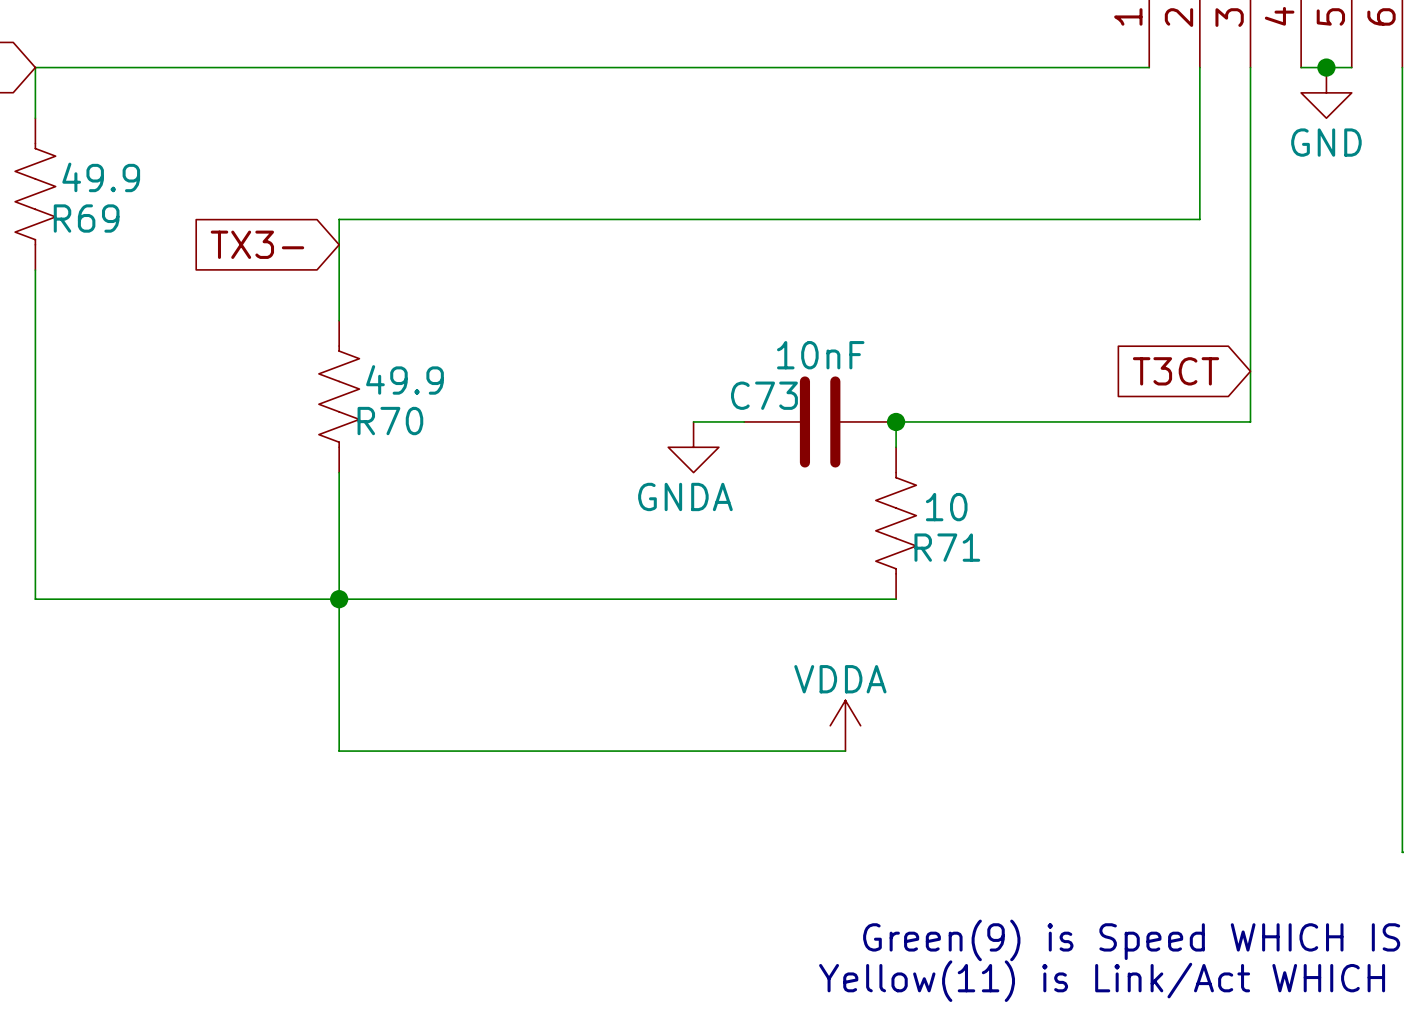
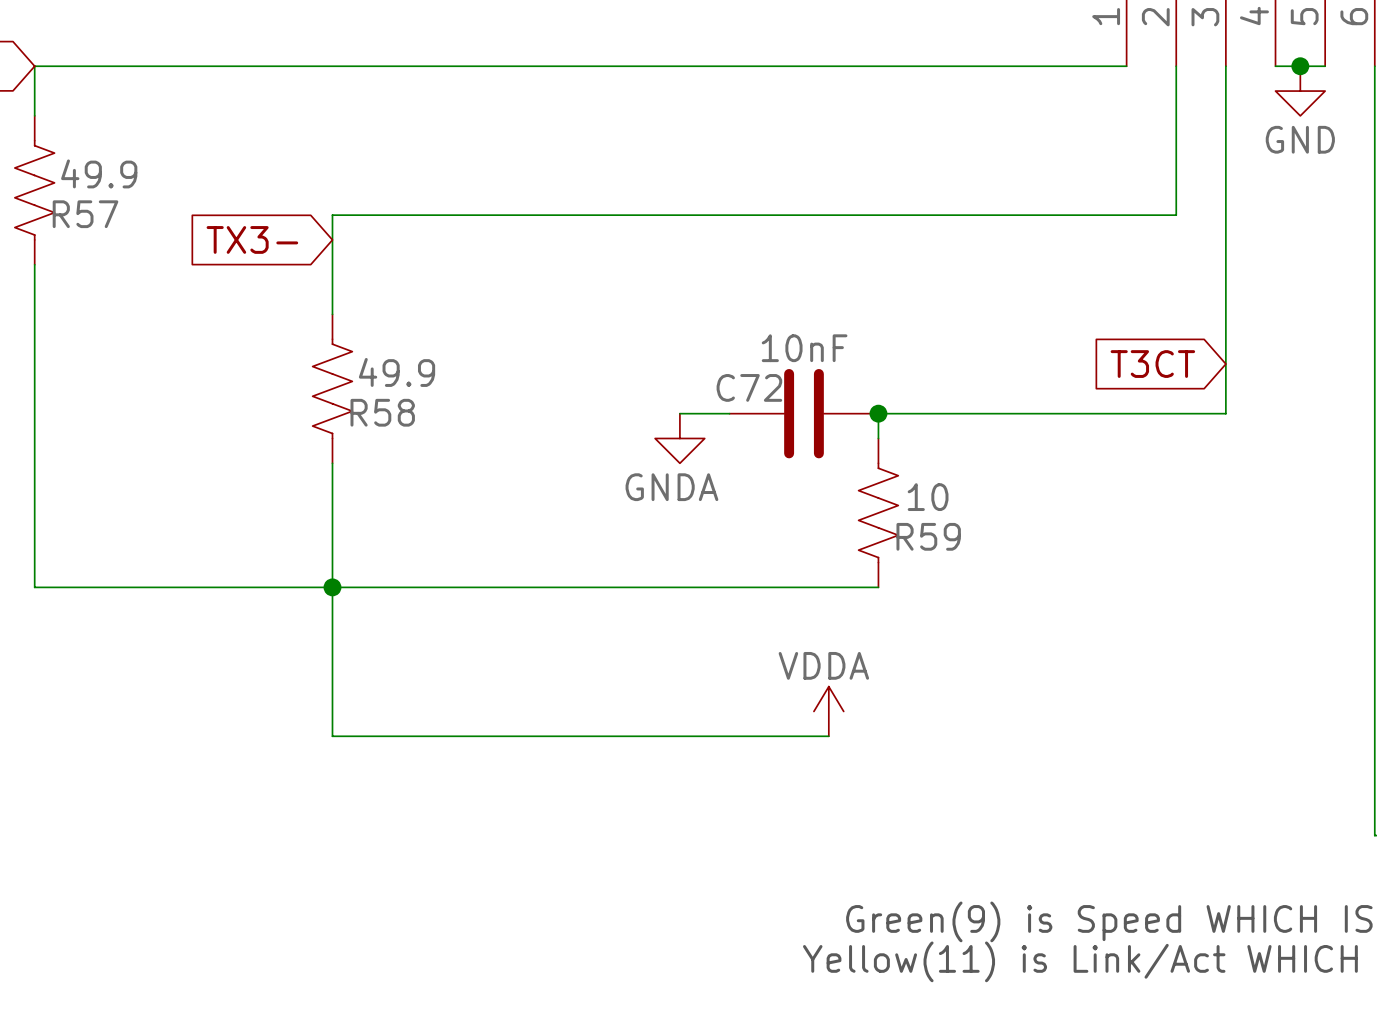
R69 name: R69 (86, 218) -> R57 (85, 214)
C73 name: C73 (764, 395) -> C72 (749, 387)
R70 name: R70 (390, 421) -> R58 (382, 412)
R71 name: R71 (947, 547) -> R59 (928, 536)

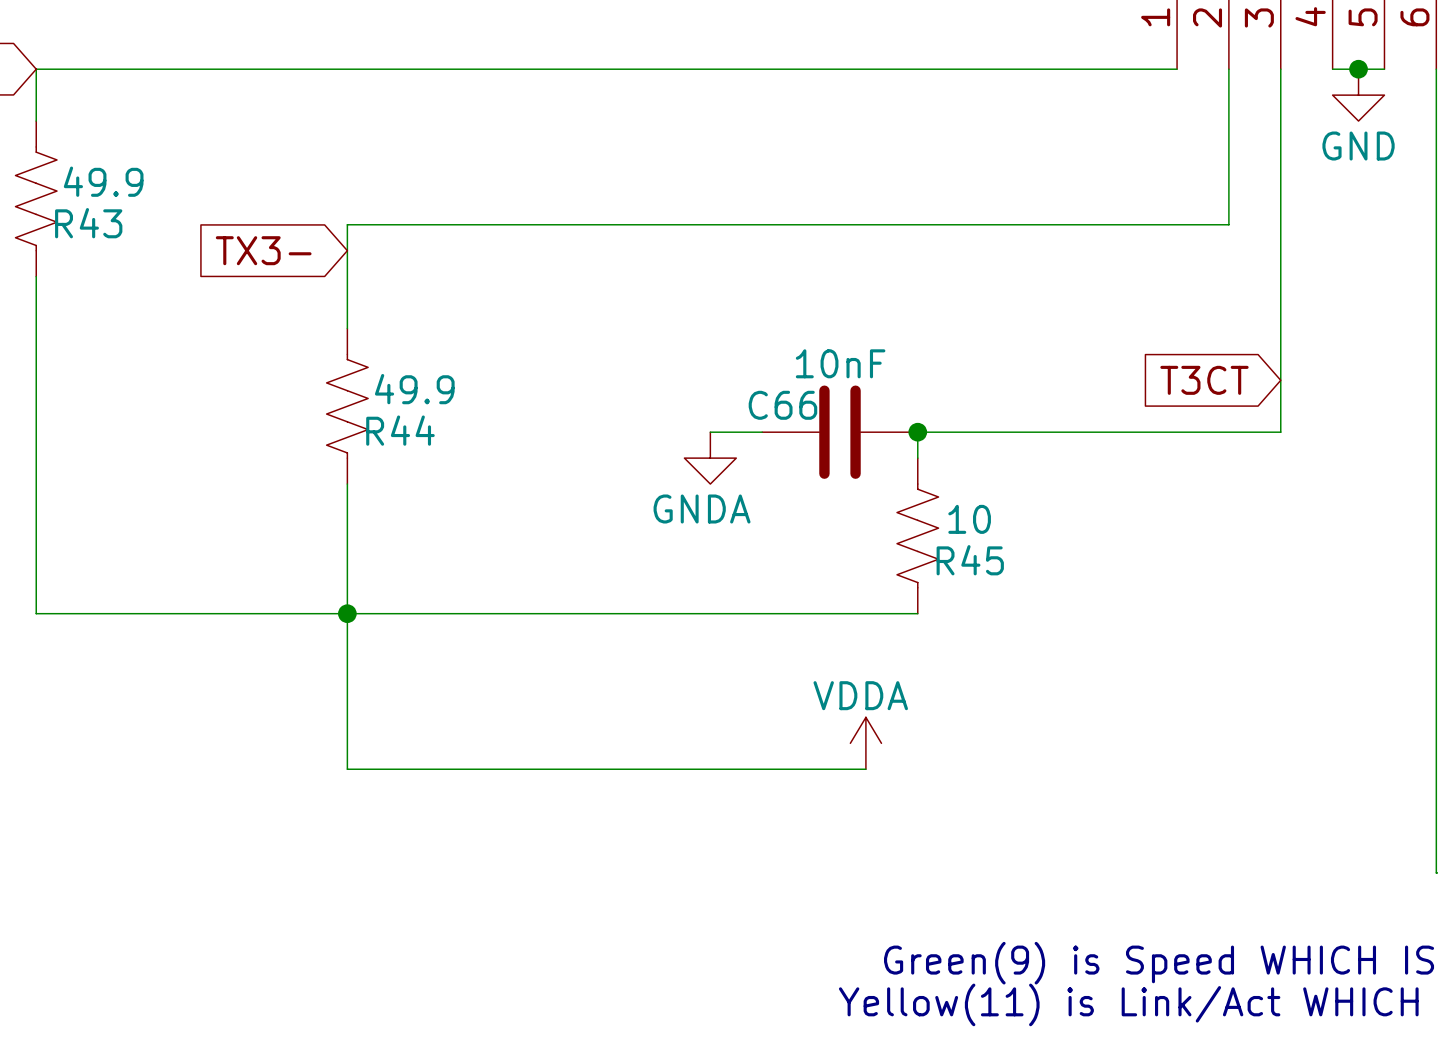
R57 name: R57 (85, 214) -> R43 (88, 223)
C72 name: C72 (749, 387) -> C66 (782, 405)
R58 name: R58 (382, 412) -> R44 (400, 430)
R59 name: R59 (928, 536) -> R45 (970, 560)

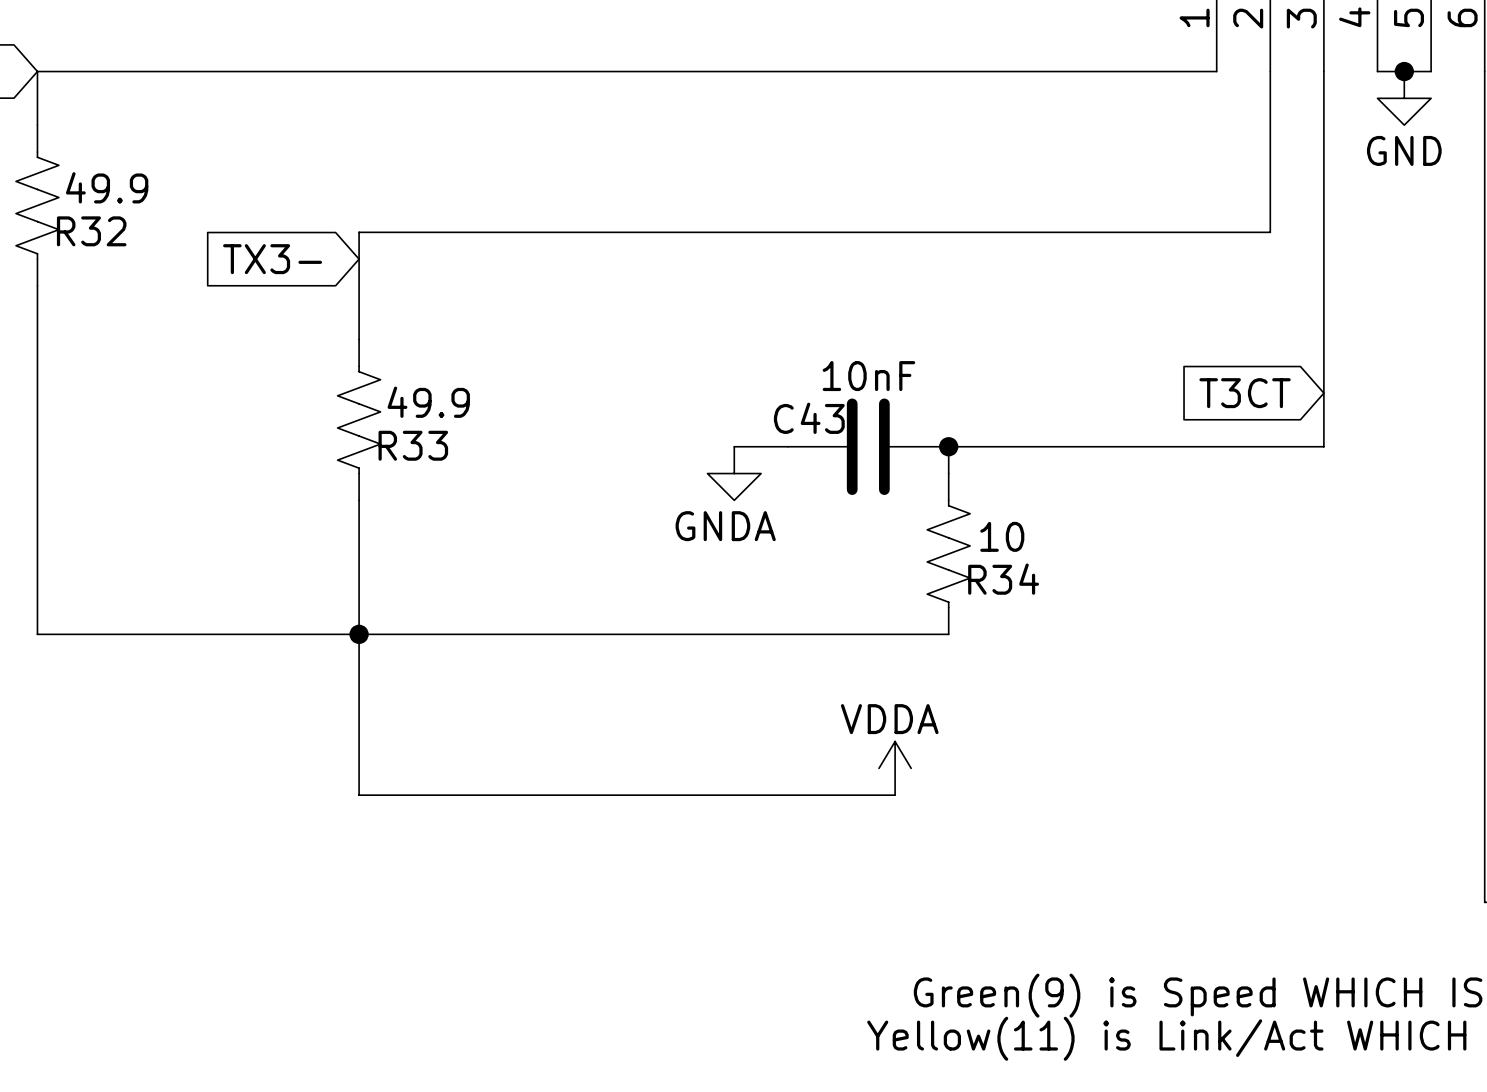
R43 name: R43 (88, 223) -> R32 (91, 231)
C66 name: C66 (782, 405) -> C43 (809, 418)
R44 name: R44 (400, 430) -> R33 (413, 445)
R45 name: R45 (970, 560) -> R34 (1003, 579)

